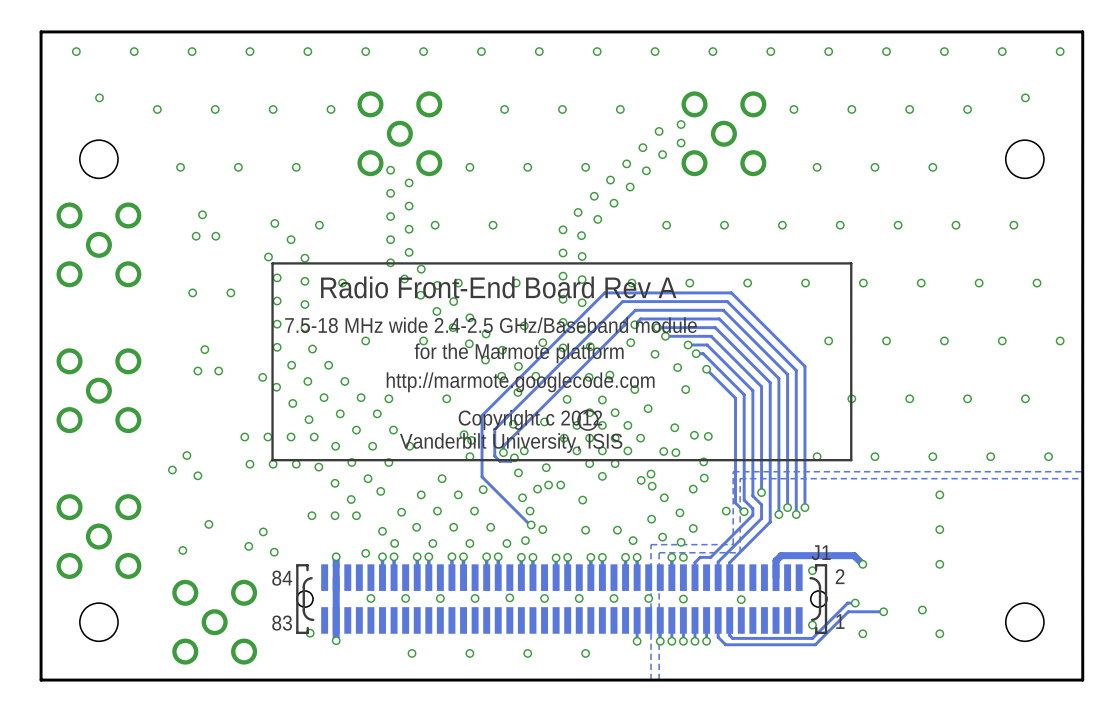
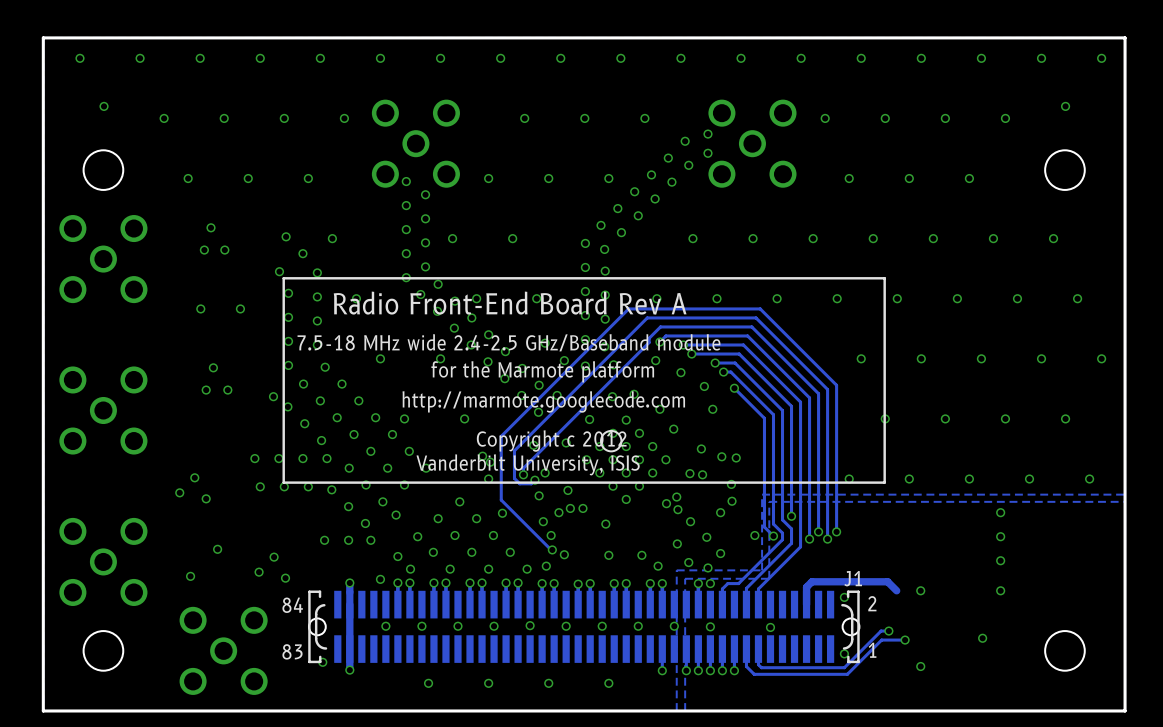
via: none -> (1000, 512)
via: (939, 494) -> none
via: none -> (1000, 536)
via: (939, 529) -> none
via: none -> (1000, 560)
via position: (862, 564) -> (920, 590)
via: (939, 564) -> none
via: none -> (1000, 590)
via: (922, 610) -> none
via: none -> (982, 638)
via: none -> (905, 640)
track: (883, 611) (870, 611) -> none
via: (883, 611) -> none
via: (862, 633) -> none
via: (939, 633) -> none
via: none -> (920, 666)

